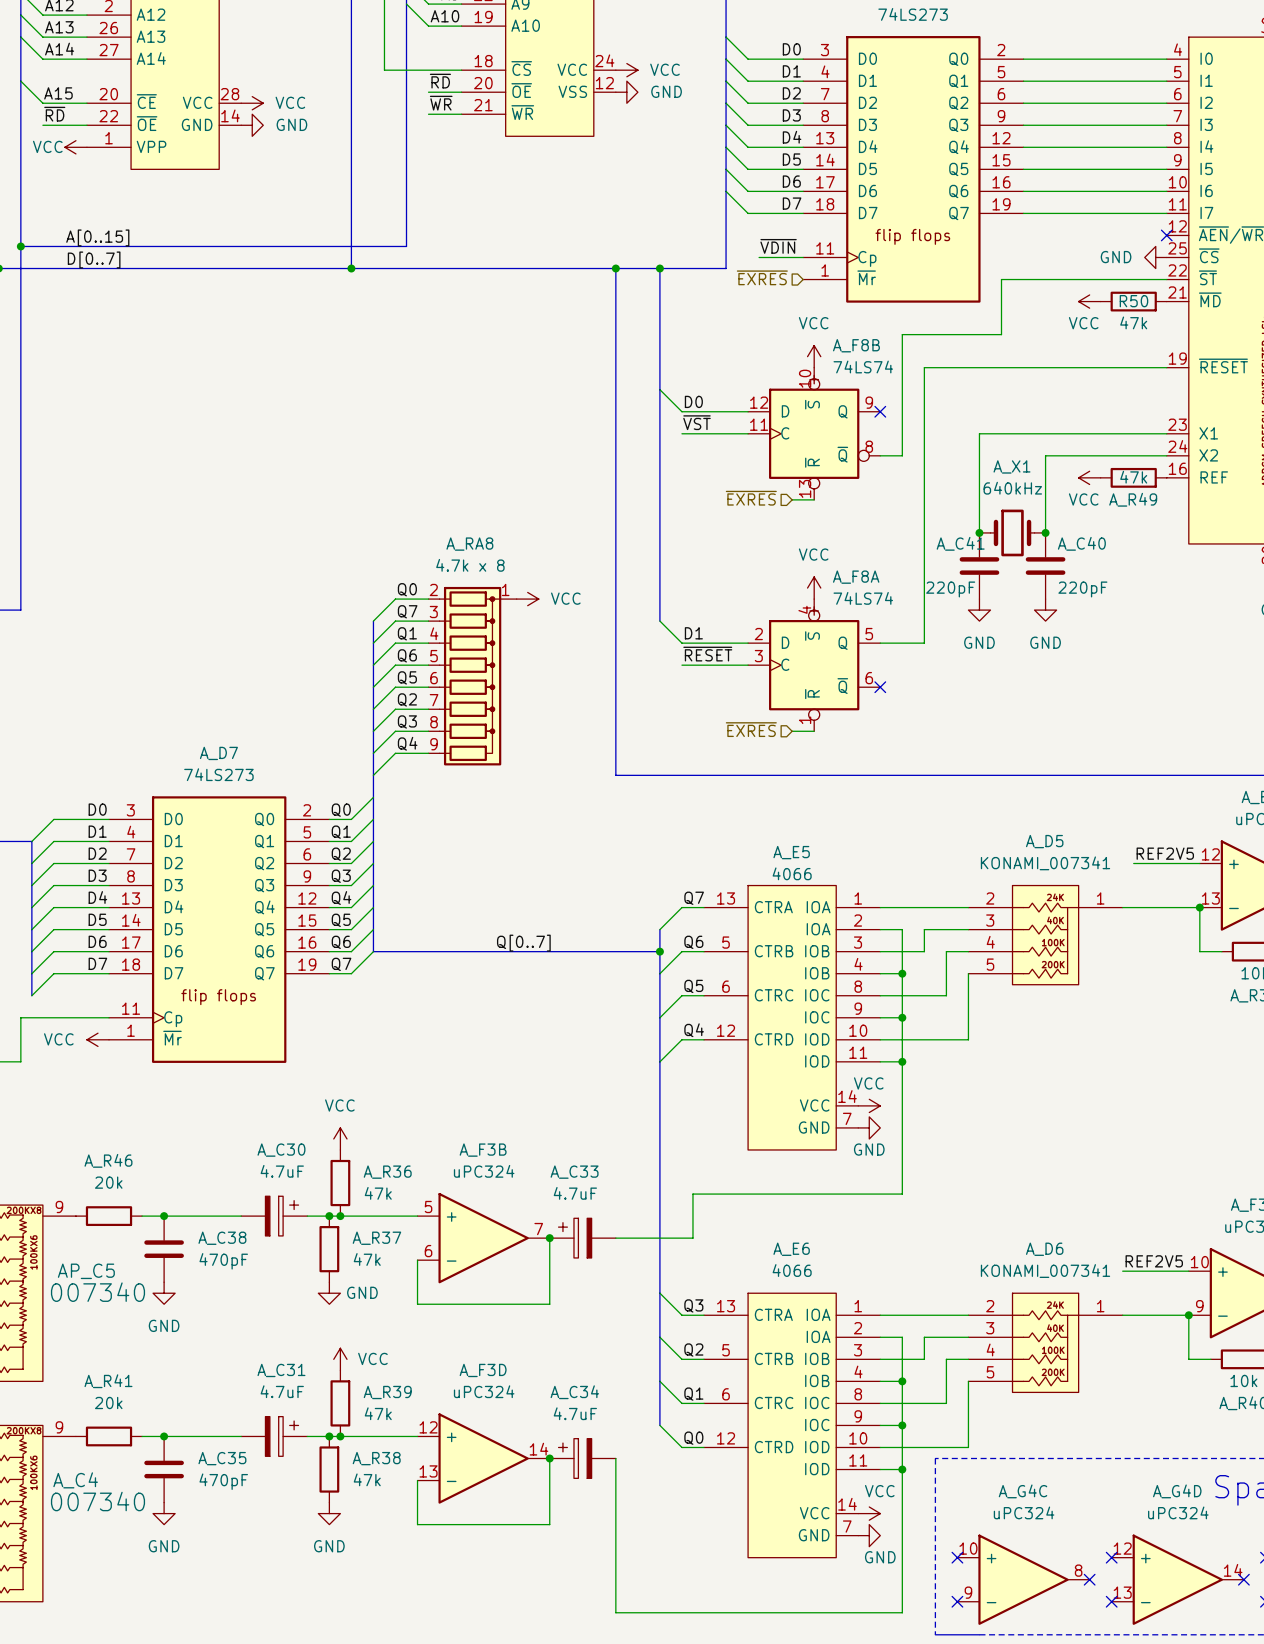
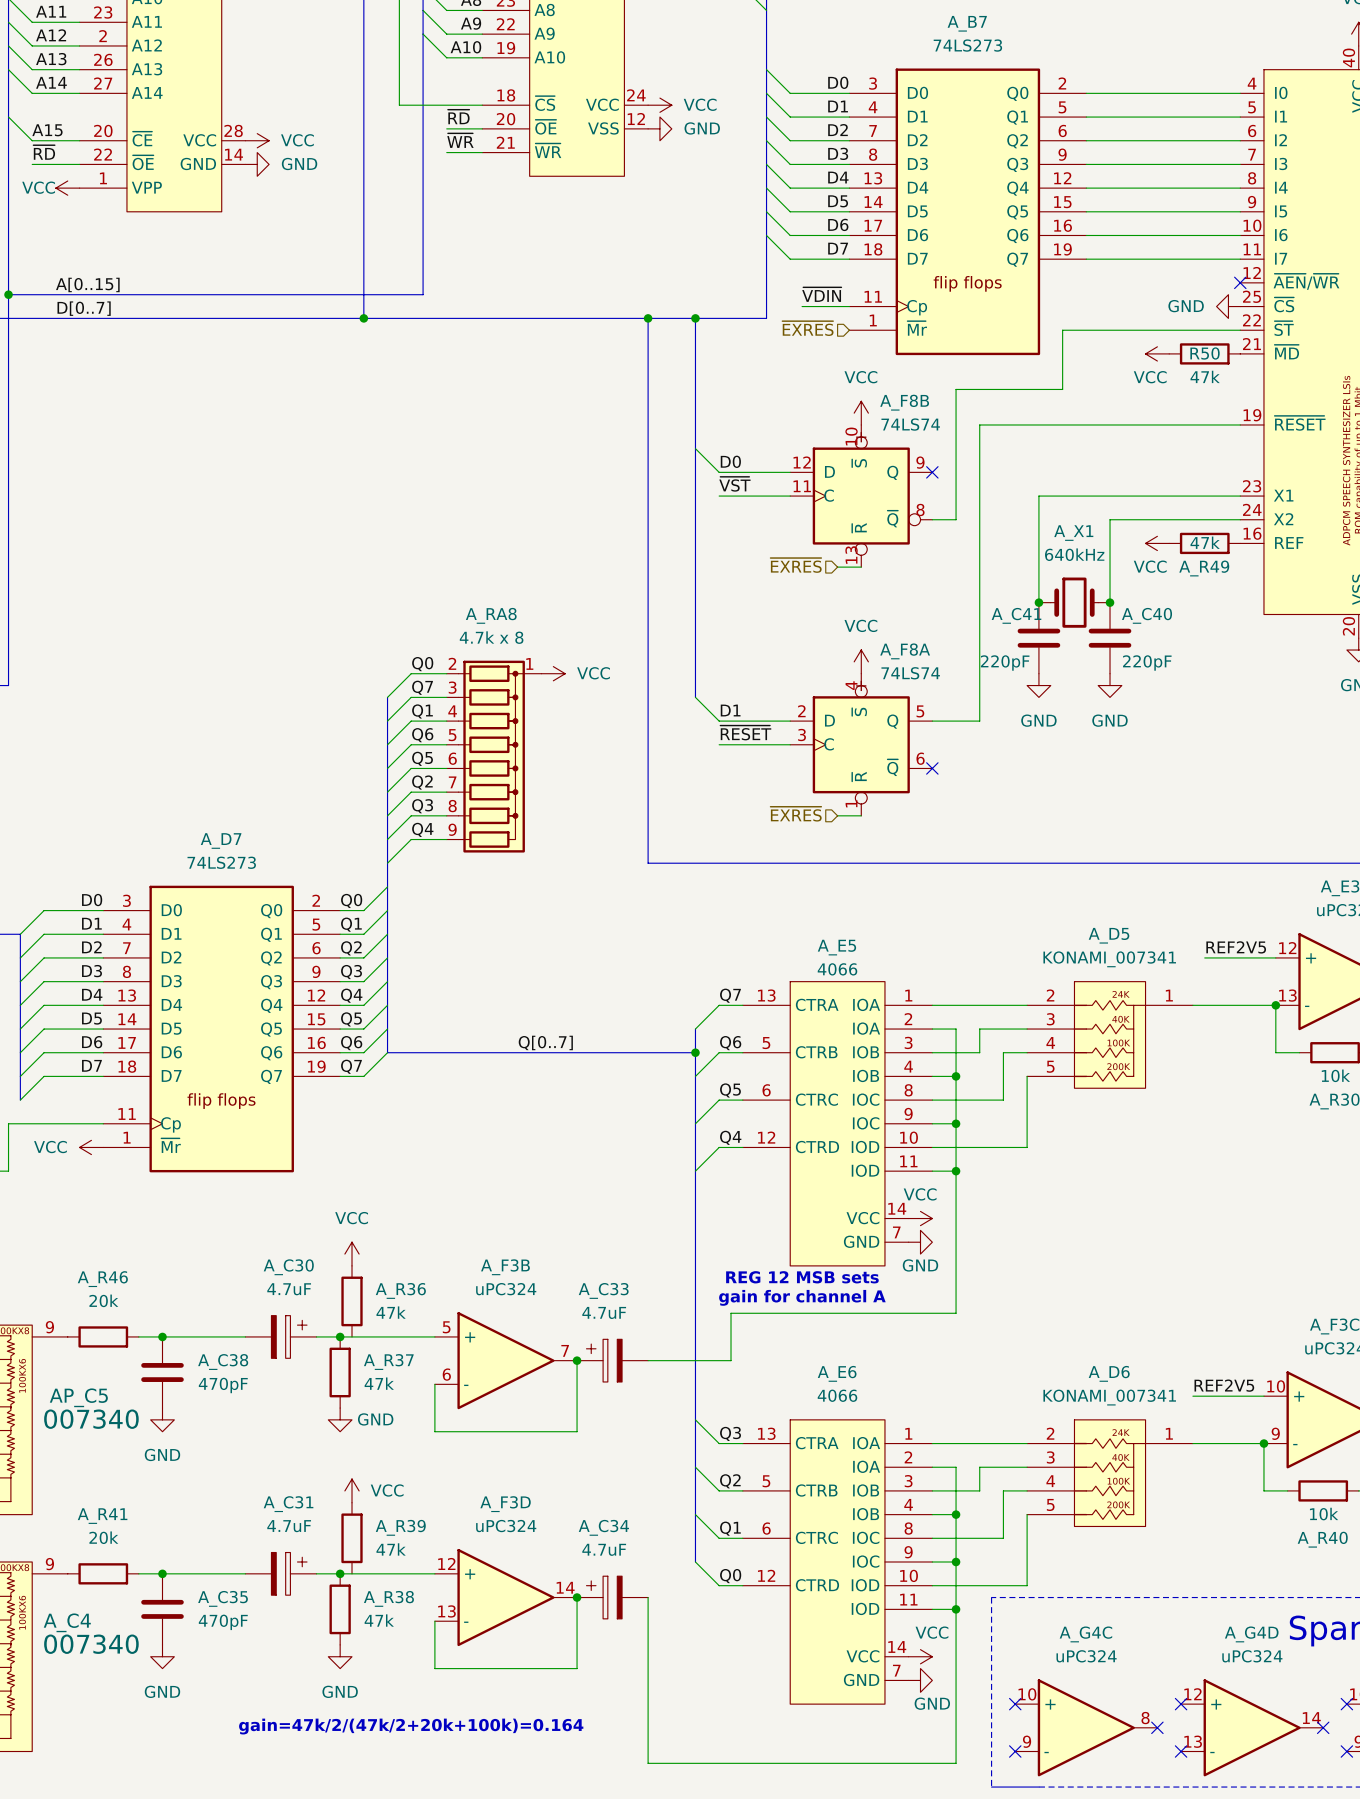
text: none -> REG 12 MSB sets (802, 1277)
text: none -> gain for channel A (802, 1297)
junction: (340, 1216) -> none
junction: (340, 1436) -> none
text: none -> gain=47k/2/(47k/2+20k+100k)=0.164 (411, 1726)

